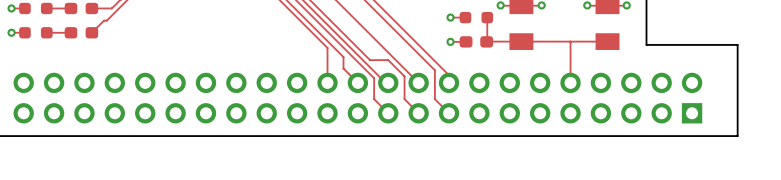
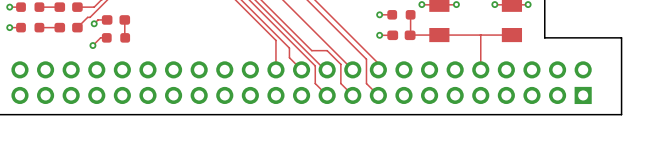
top track: none -> (107, 19) (98, 19) (94, 23)
part: none -> (115, 19)
top track: none -> (124, 19) (125, 37)
via: none -> (94, 23)
top track: none -> (106, 37) (100, 37) (92, 45)
part: none -> (115, 37)
via: none -> (92, 45)

